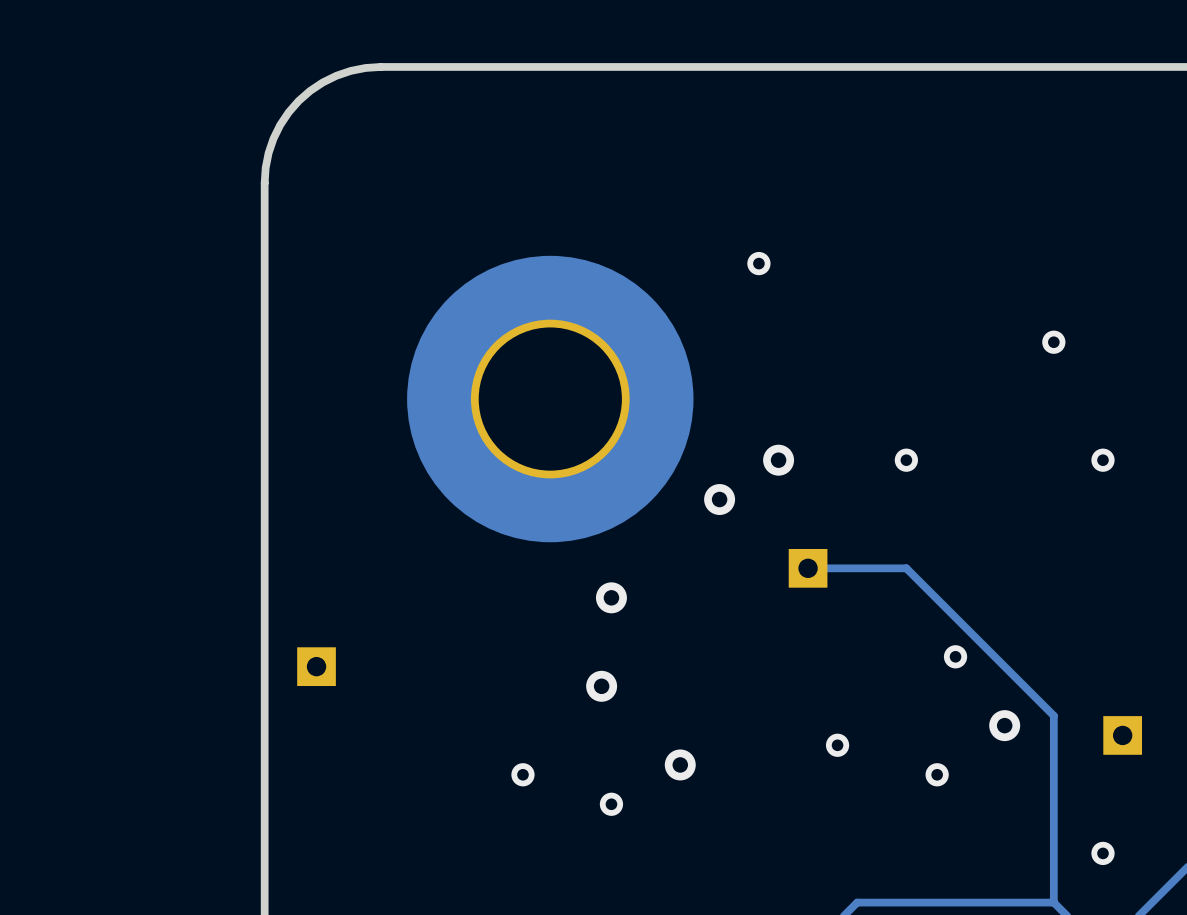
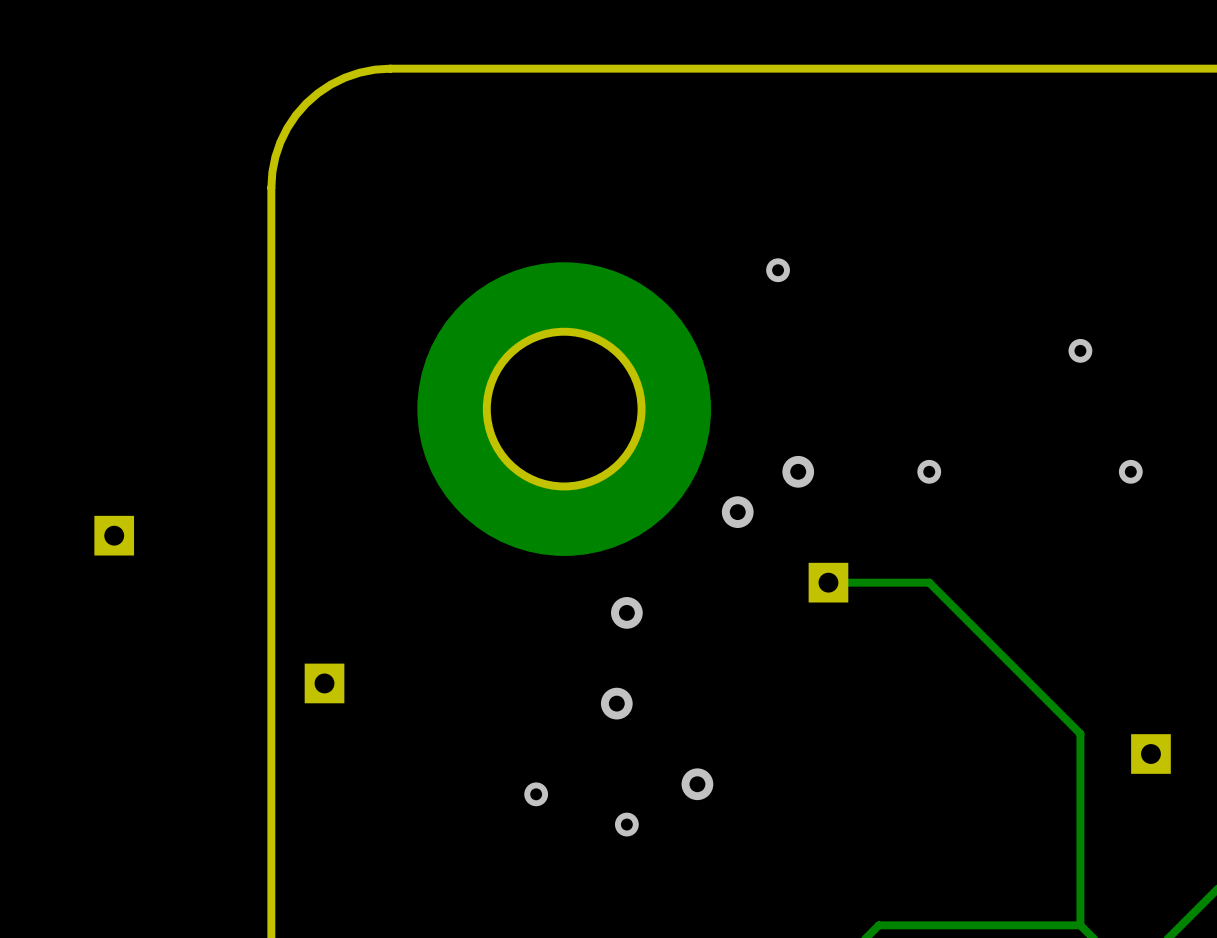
part: none -> (114, 535)
via: (955, 656) -> none
via: (1004, 725) -> none
via: (837, 745) -> none
via: (937, 774) -> none
via: (1102, 853) -> none

